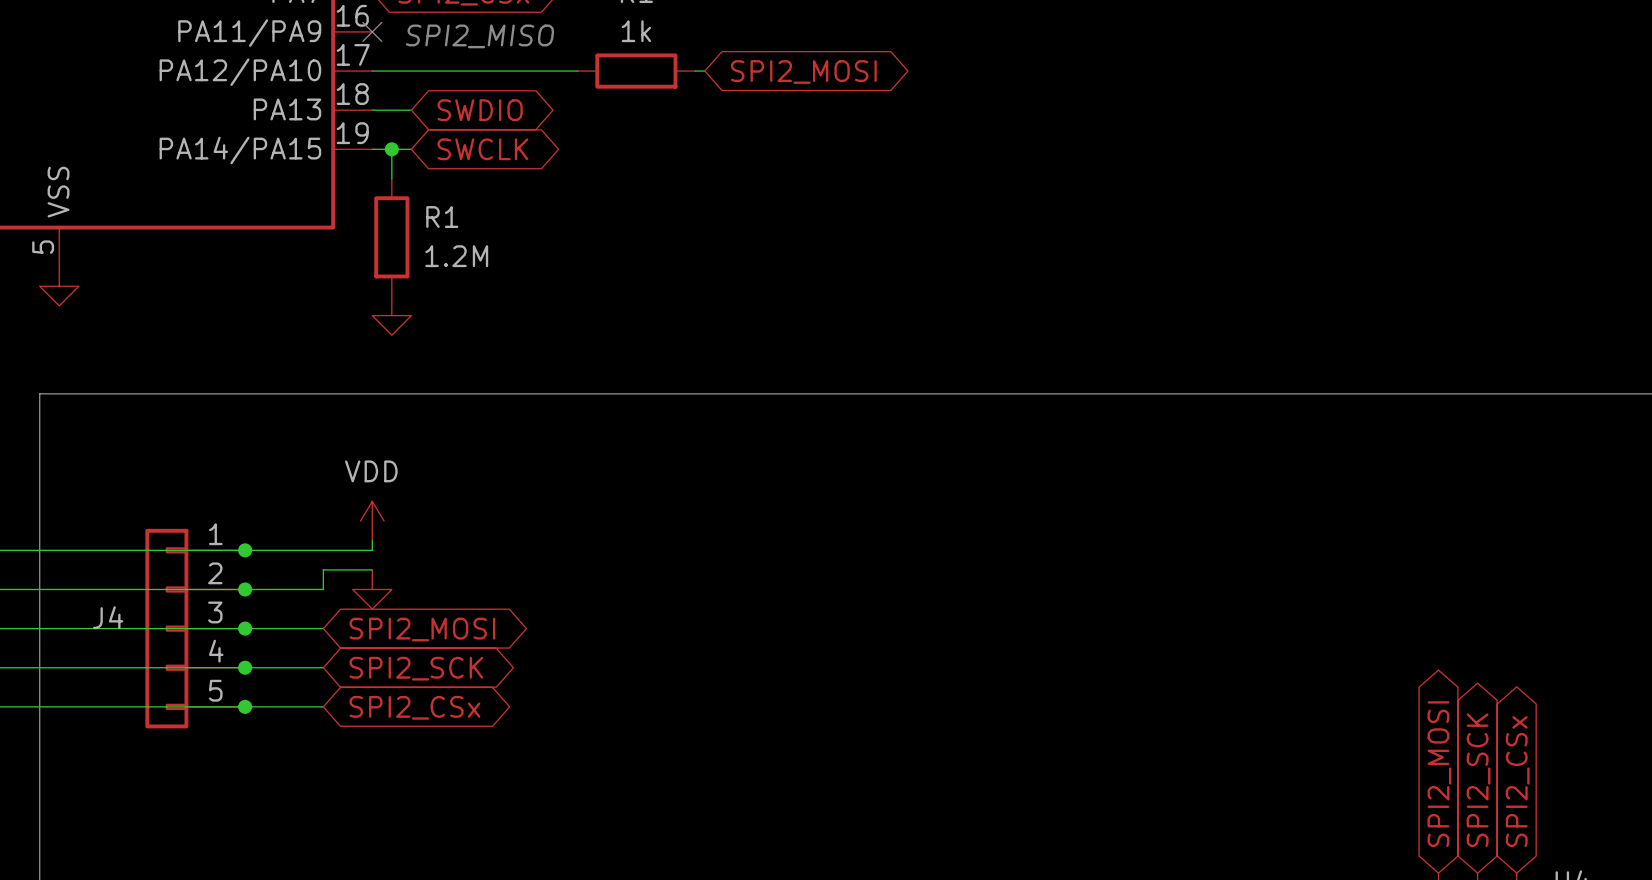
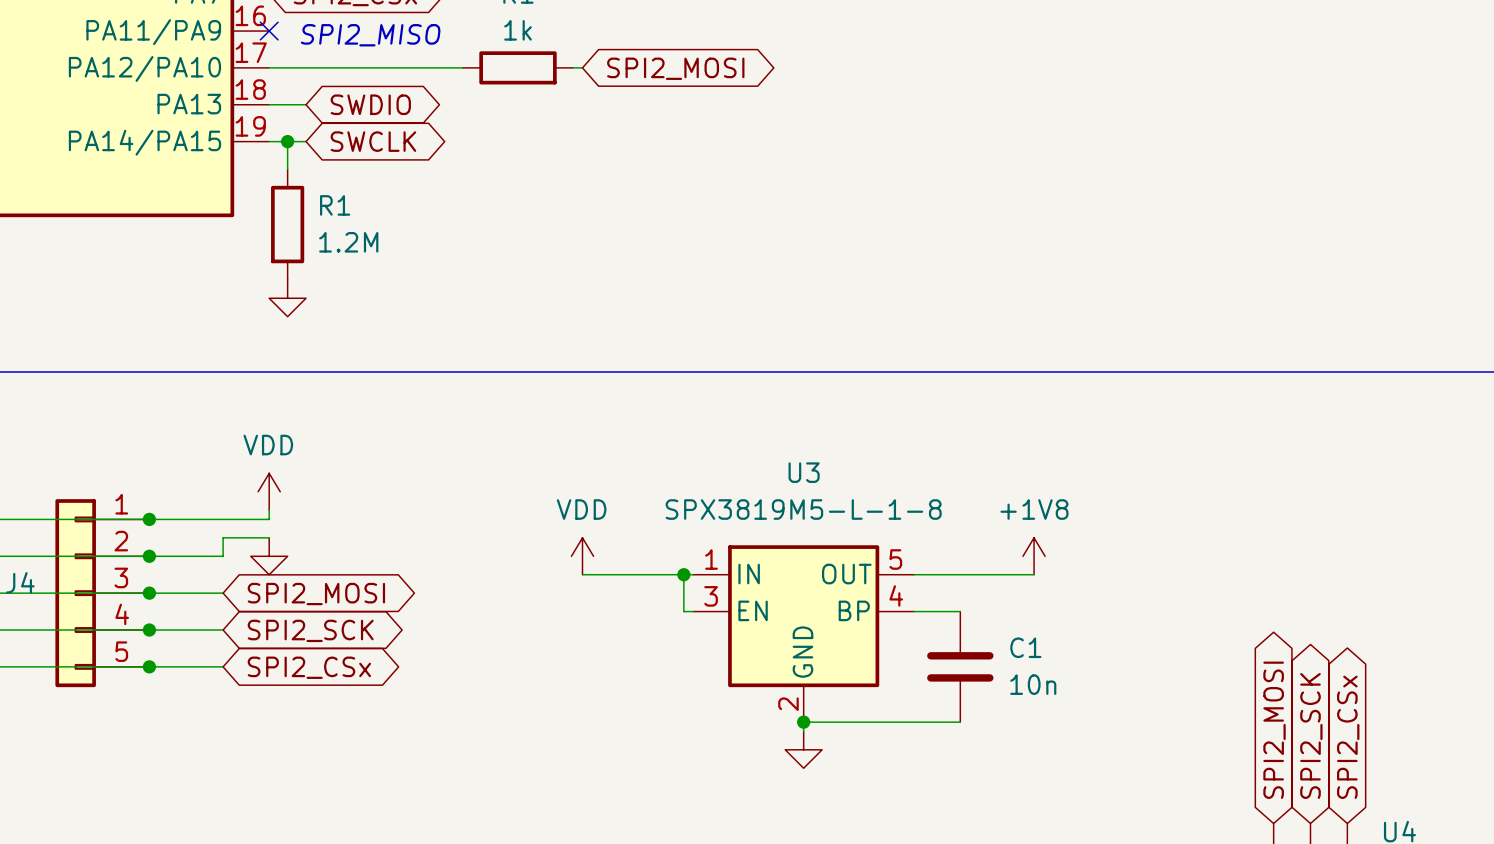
power symbol: none -> VDD (582, 556)
power symbol: none -> +1V8 (1034, 556)
wire: none -> (582, 574) (693, 574)
wire: none -> (683, 574) (683, 611) (693, 611)
junction: none -> (683, 574)
wire: none -> (914, 574) (1034, 574)
wire: none -> (914, 611) (960, 611)
U3: none -> SPX3819M5-L-1-8 (803, 633)
C1: none -> 10n (960, 666)
junction: none -> (803, 722)
wire: none -> (960, 722) (803, 722) (803, 731)
power symbol: none -> (803, 749)

